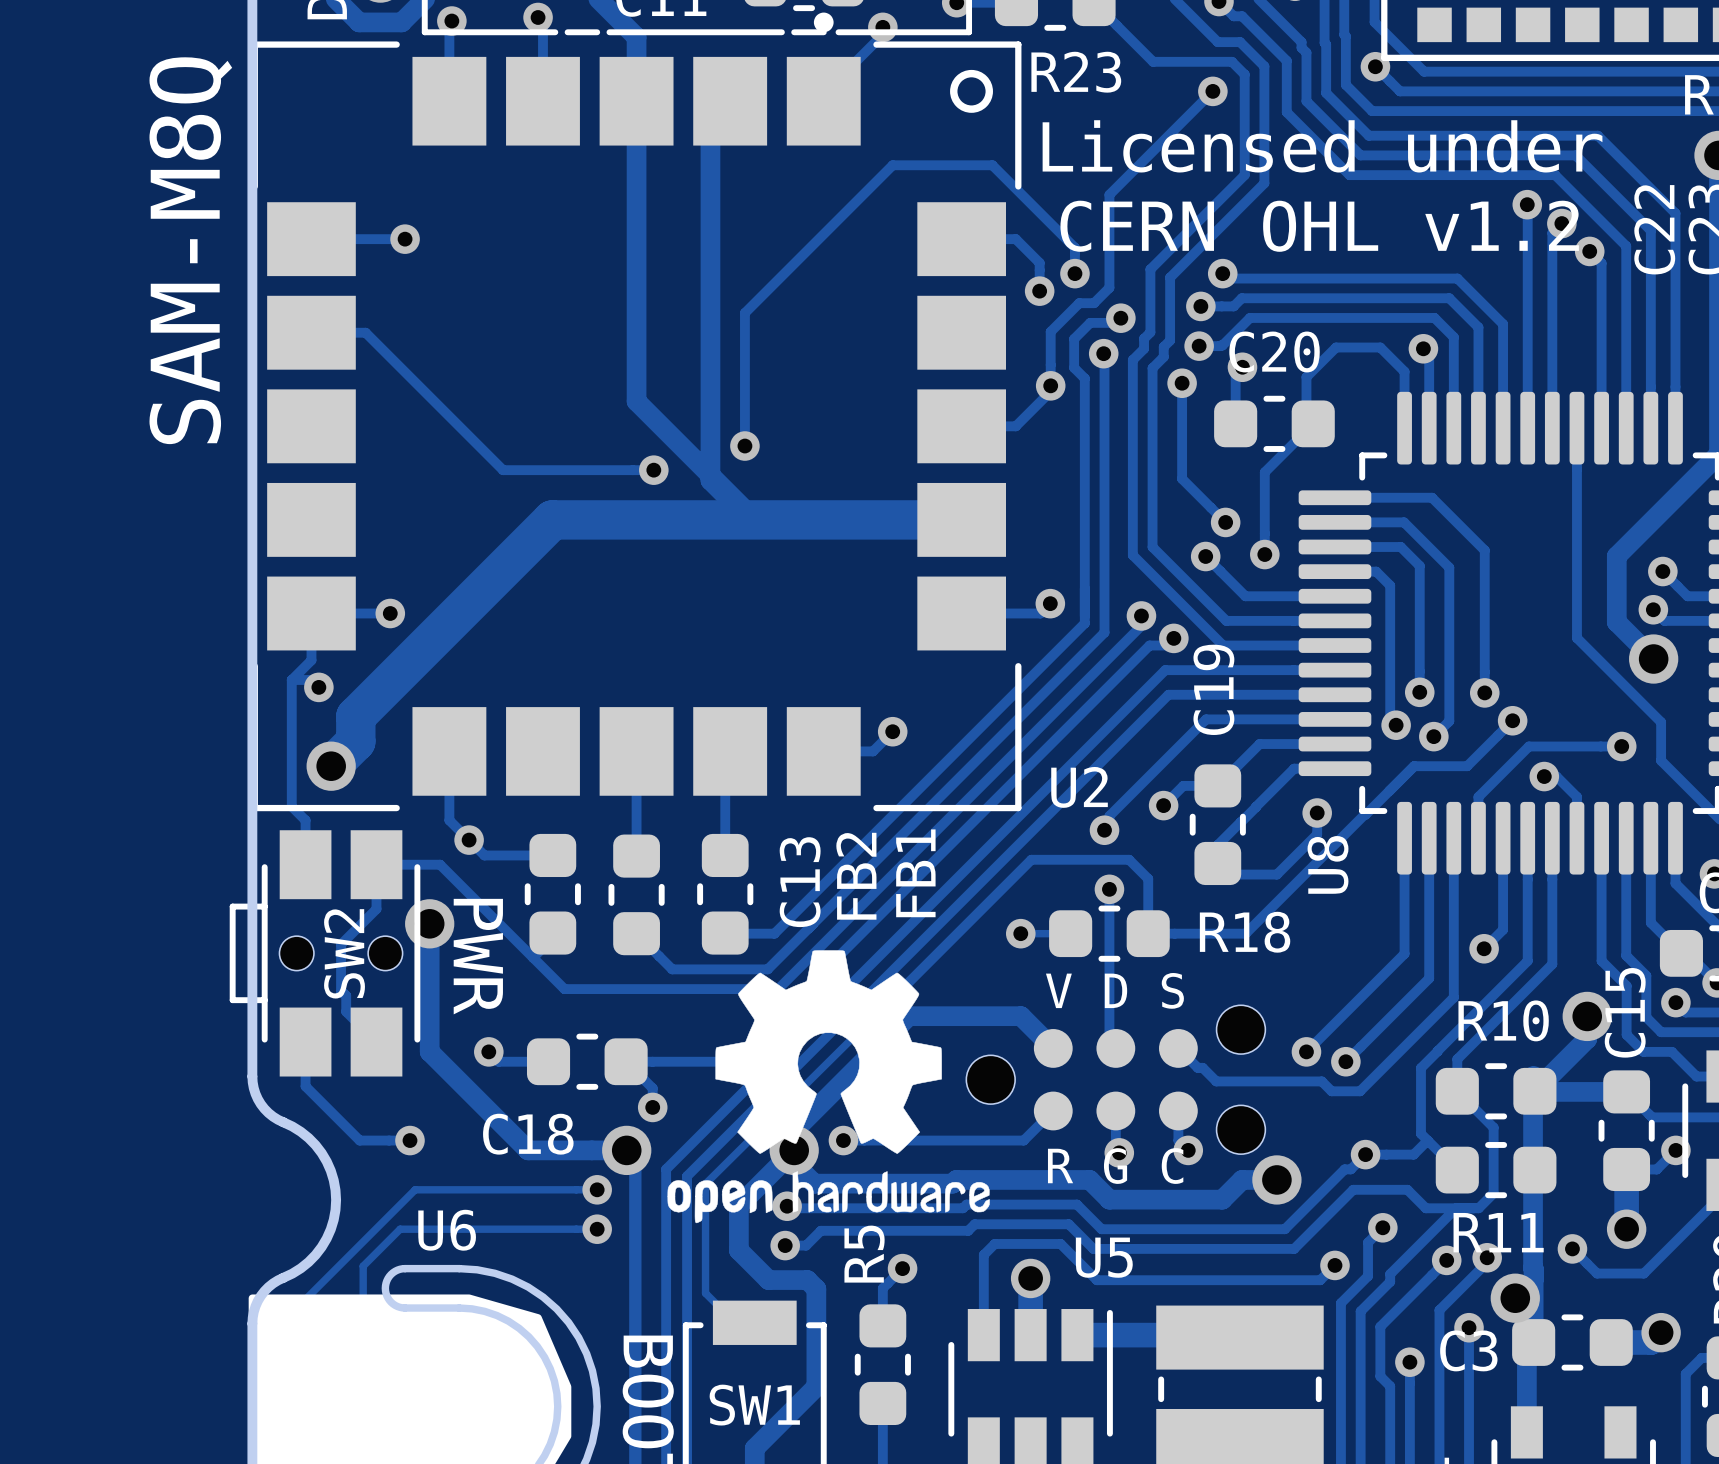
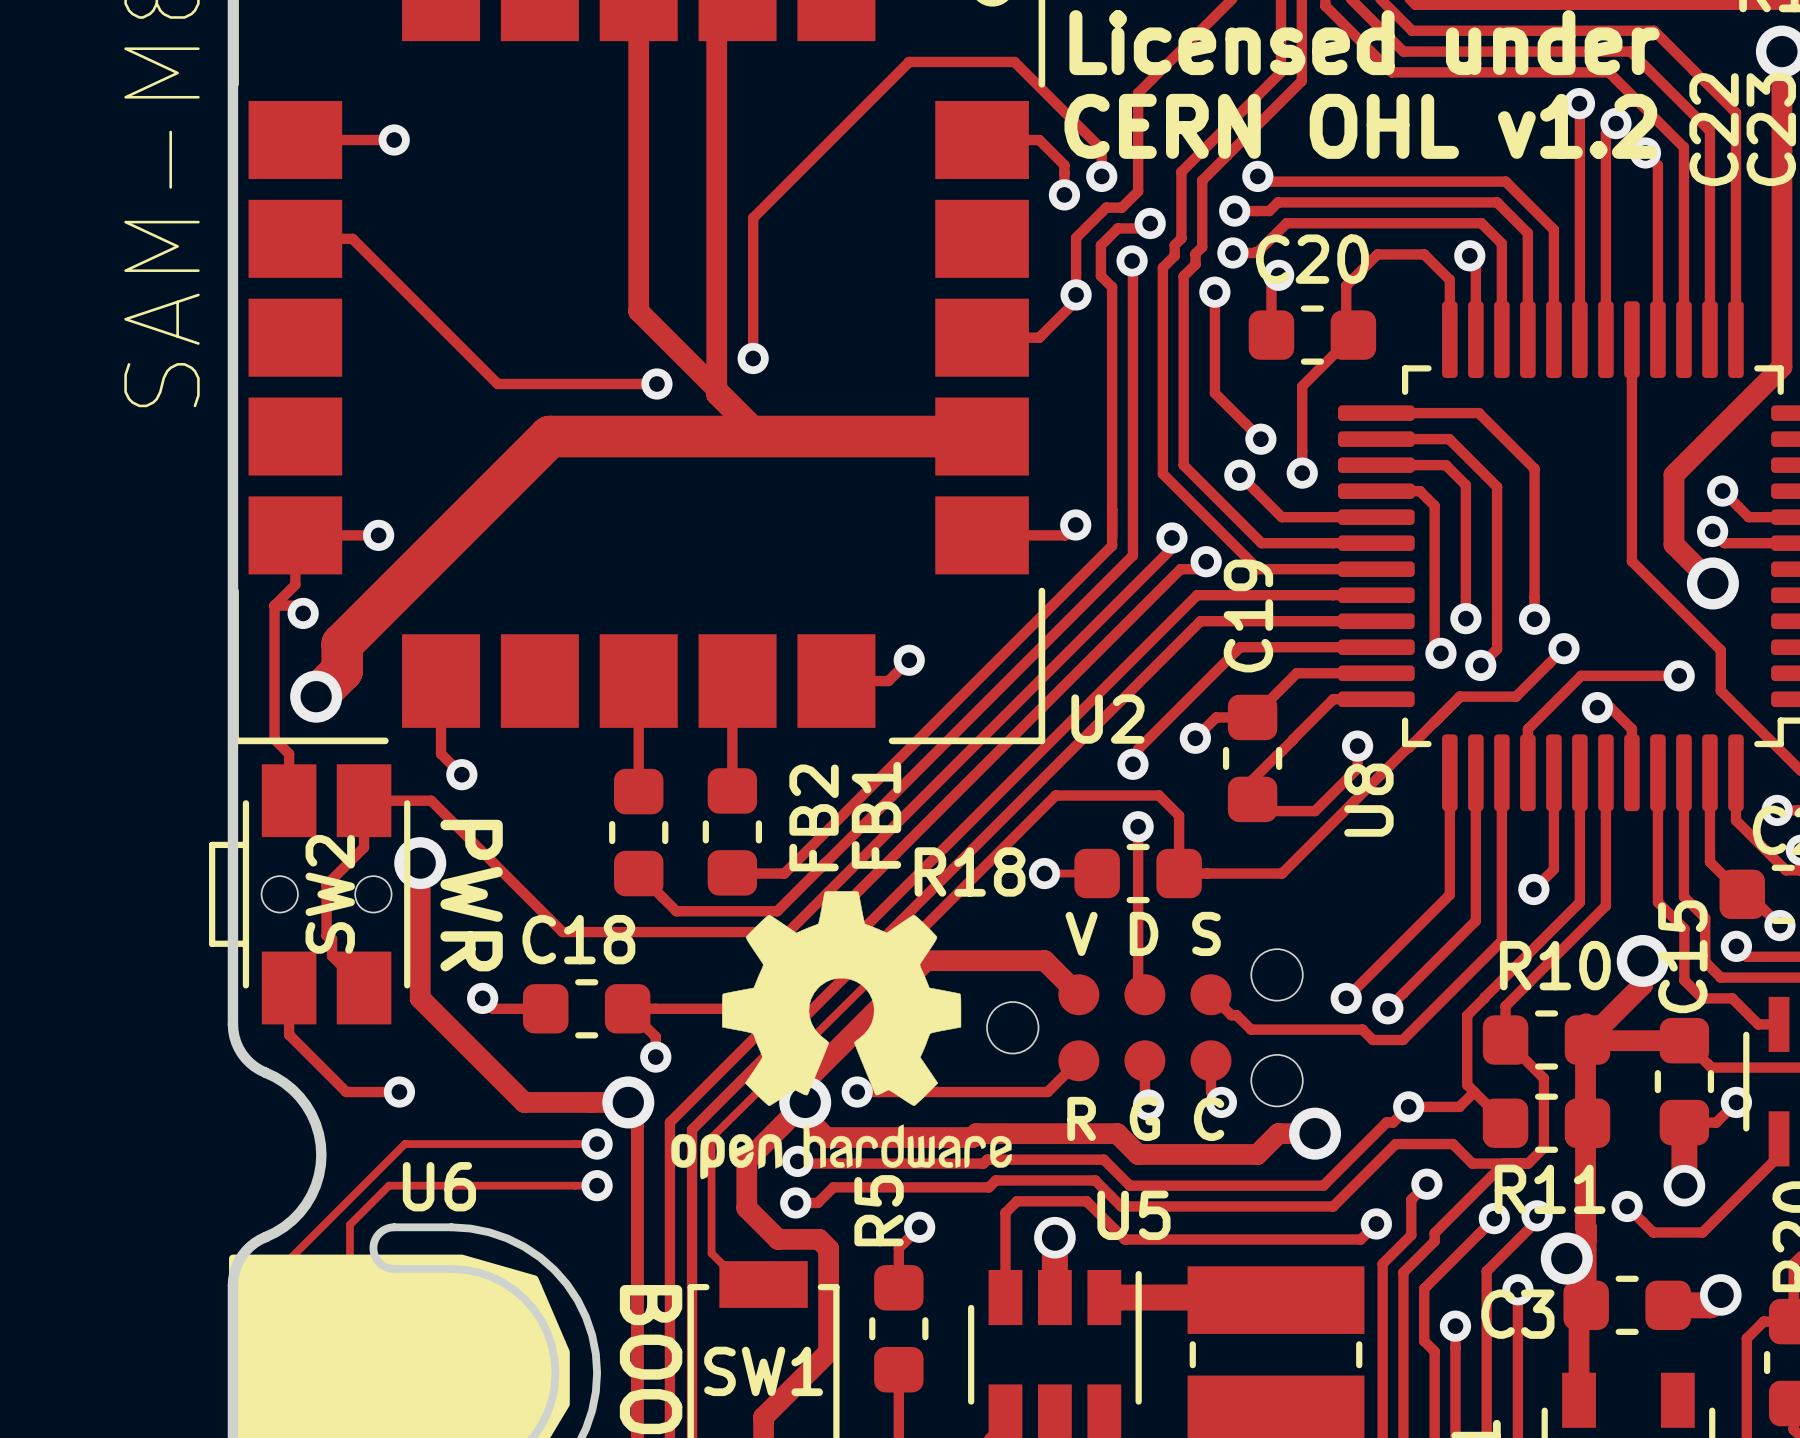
track: (474, 845) (484, 855) (552, 855) -> none
FB1 name position: FB1 (915, 873) -> FB1 (876, 815)
FB2 name position: FB2 (856, 876) -> FB2 (814, 817)
C13: (552, 894) -> none
R18 name position: R18 (1245, 932) -> R18 (970, 871)
C18 name position: C18 (528, 1134) -> C18 (578, 939)

